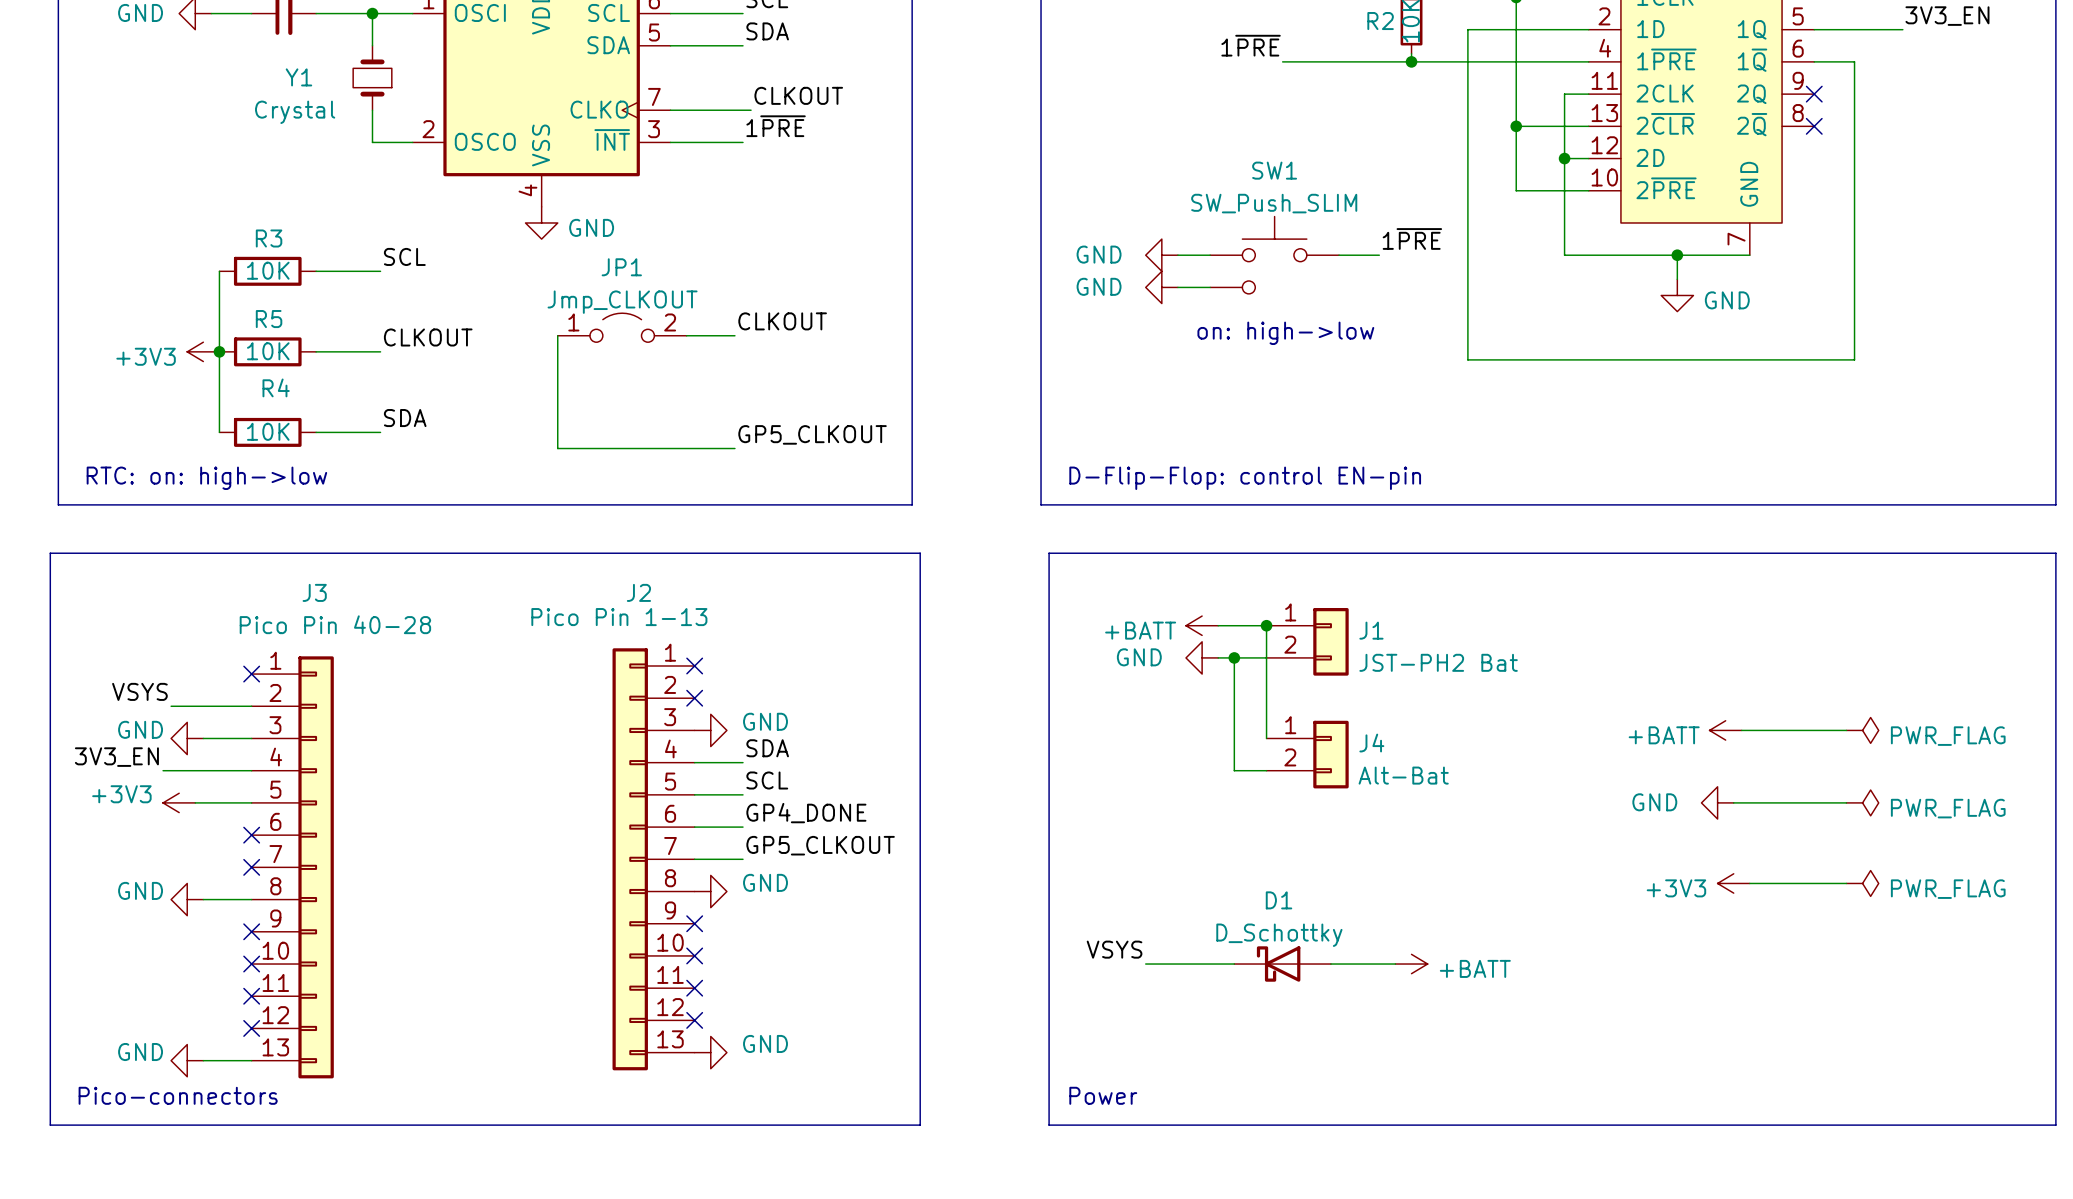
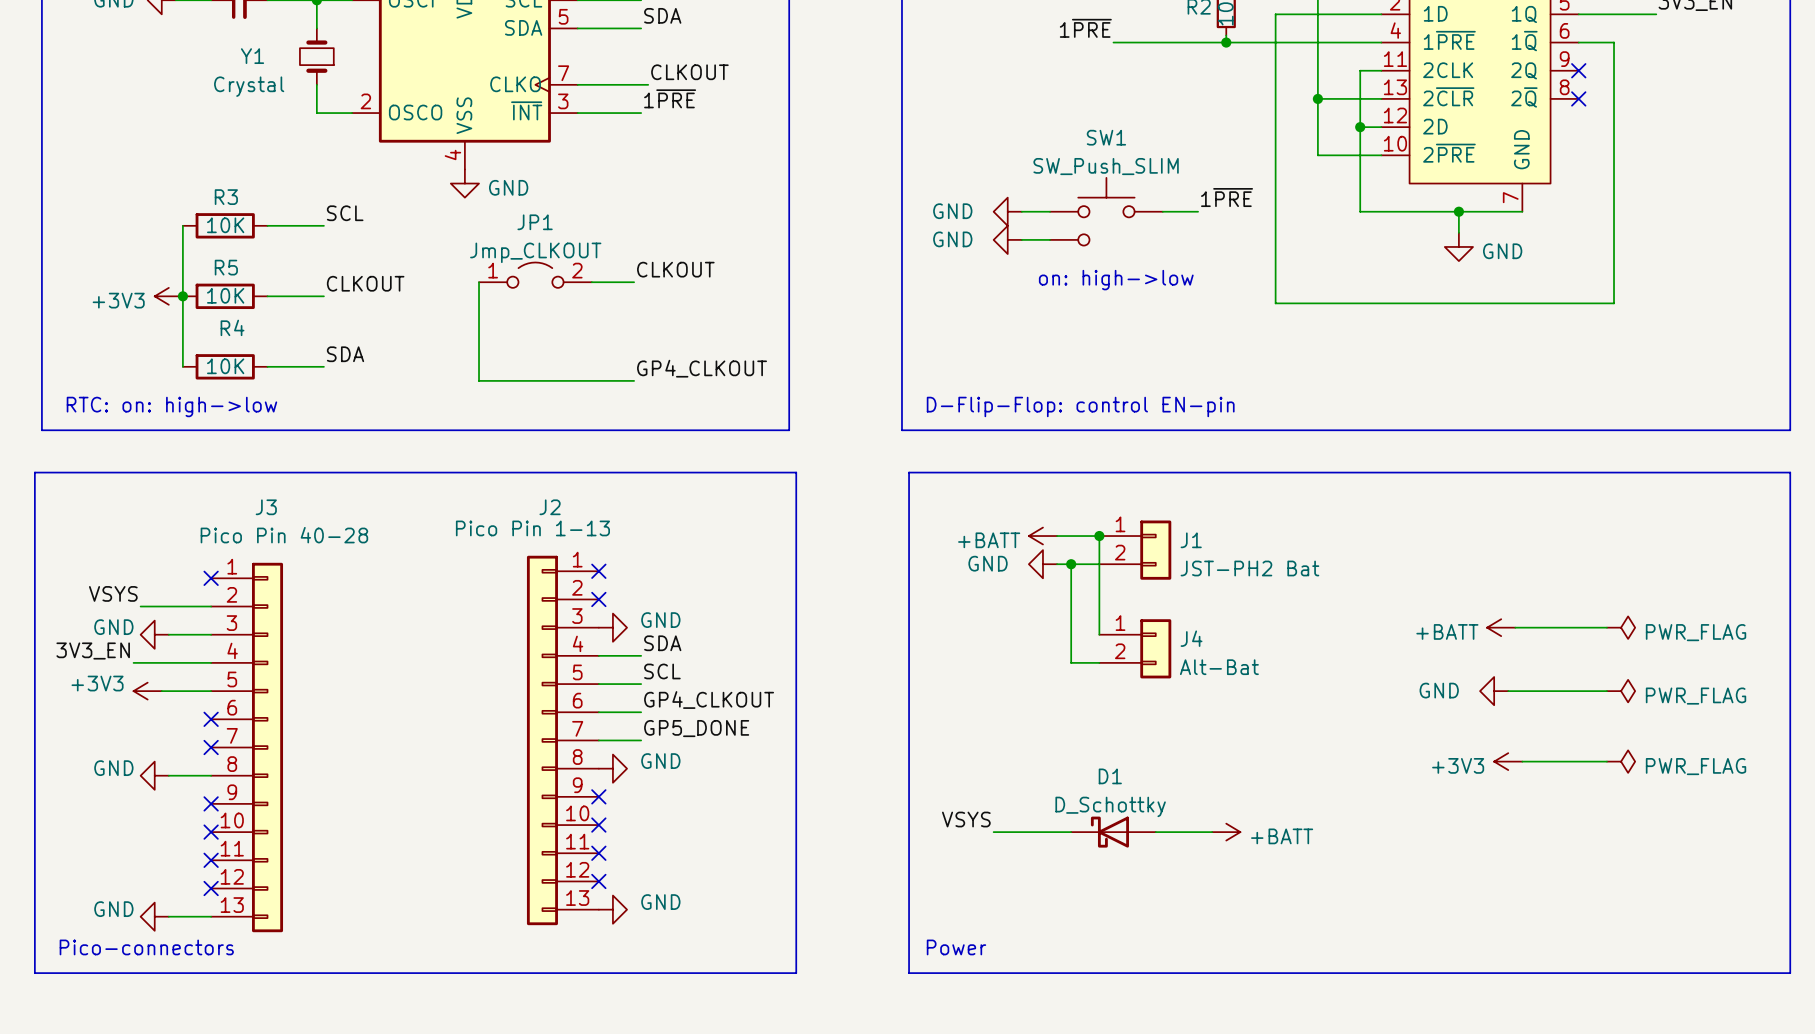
label: GP5_CLKOUT (812, 434) -> GP4_CLKOUT (702, 368)
label: GP4_DONE (806, 813) -> GP4_CLKOUT (709, 700)
label: GP5_CLKOUT (820, 845) -> GP5_DONE (696, 728)

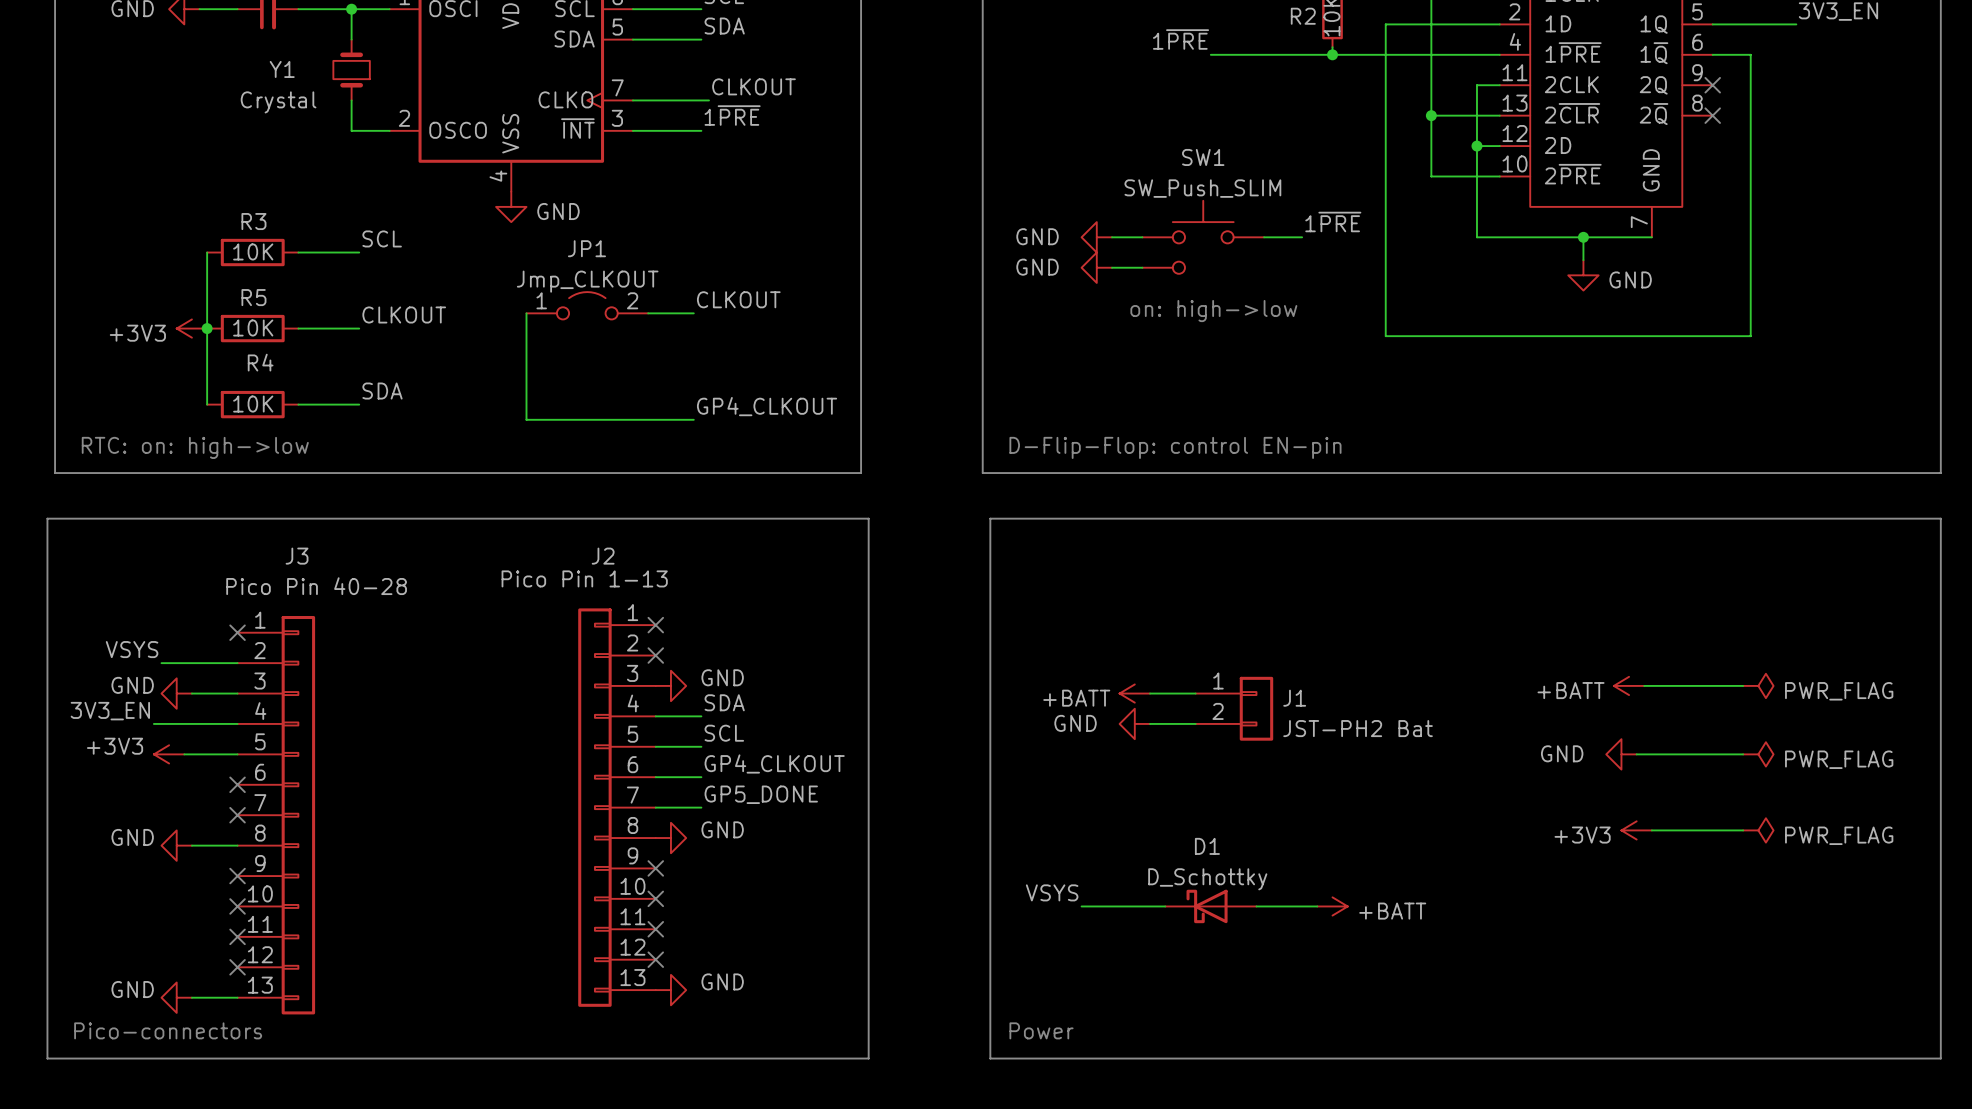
power symbol position: +BATT (1042, 536) -> +BATT (1134, 693)
wire: (1057, 536) (1099, 536) (1099, 634) -> (1150, 693) (1195, 693)
junction: (1099, 536) -> none
J1: JST-PH2 Bat (1135, 550) -> none
power symbol position: GND (1042, 564) -> GND (1134, 723)
wire: (1057, 564) (1099, 564) -> none
wire: (1071, 564) (1071, 662) -> (1150, 723) (1165, 723)
junction: (1071, 564) -> none
J4 name: J4 (1191, 638) -> J1 (1294, 698)
J4 value: Alt-Bat (1219, 667) -> JST-PH2 Bat (1358, 728)

